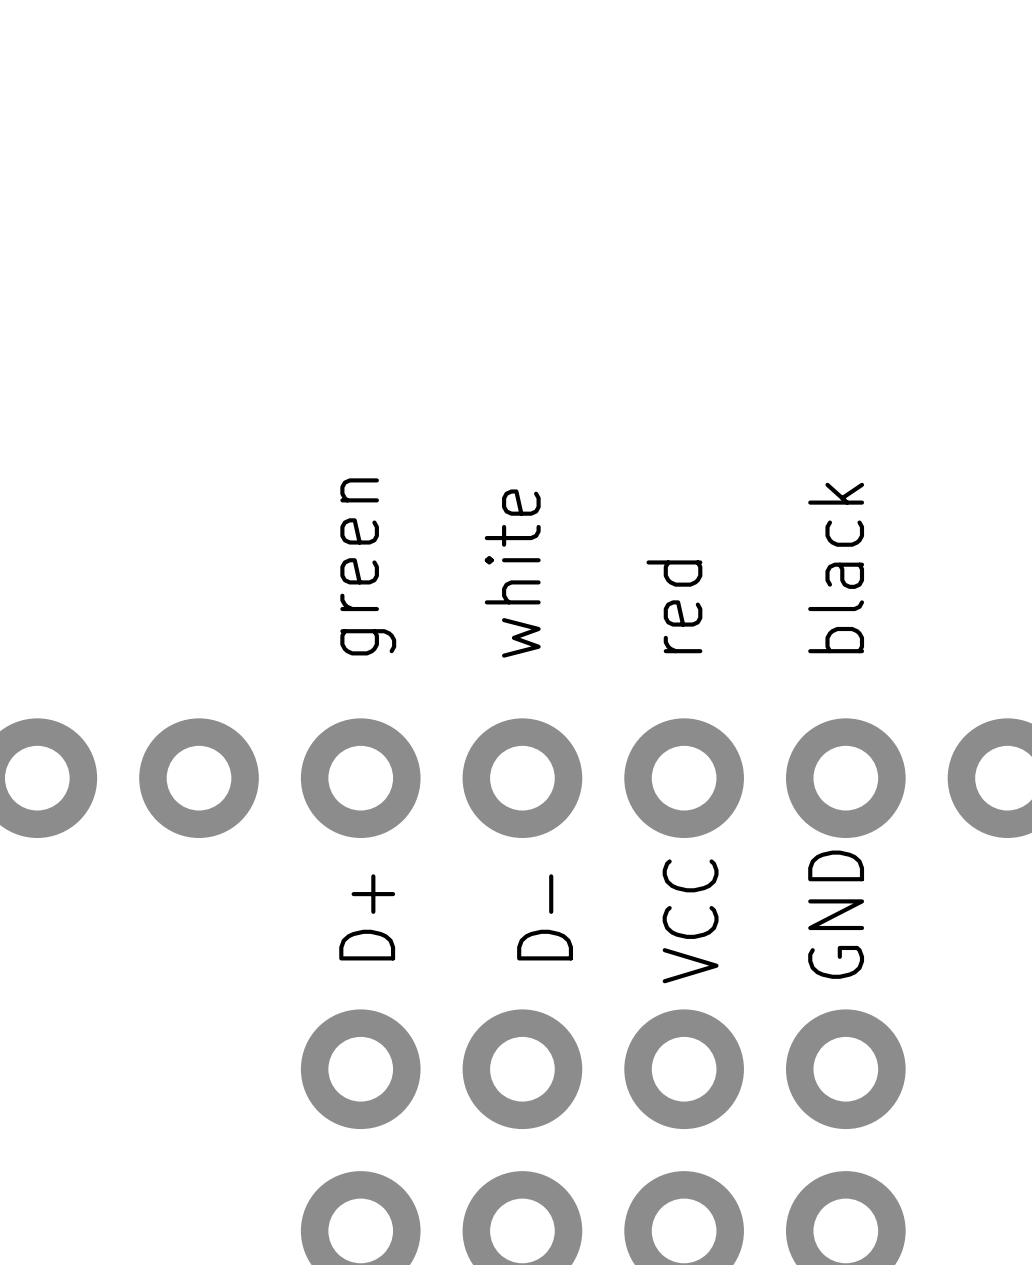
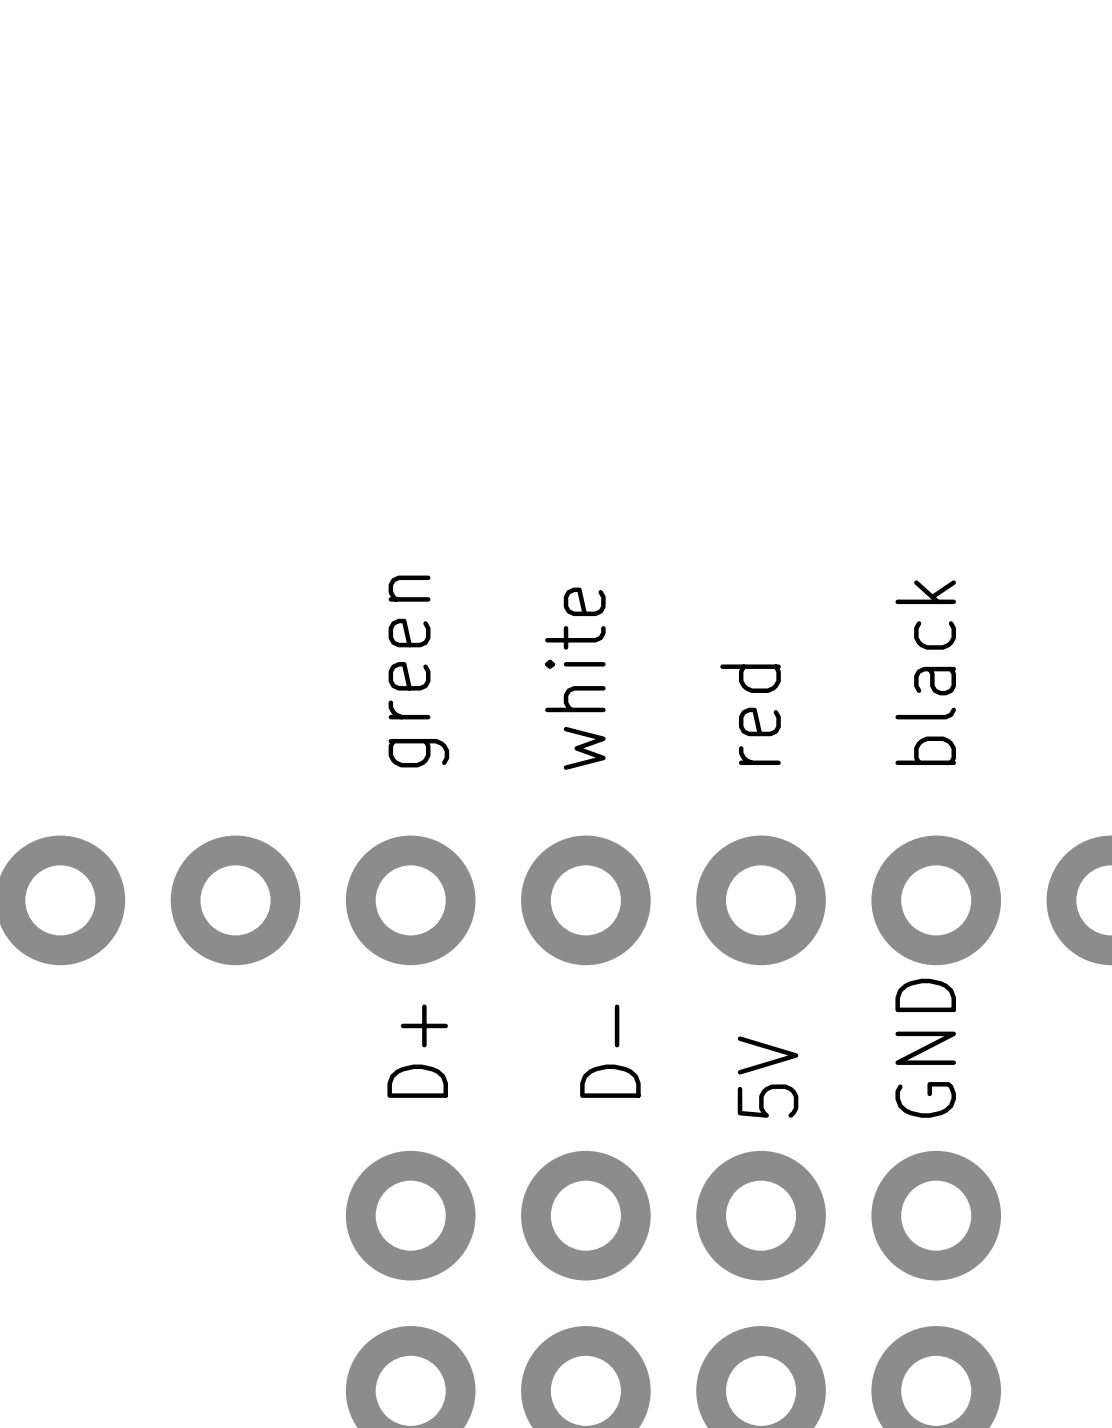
text: VCC (690, 921) -> 5V (768, 1077)

